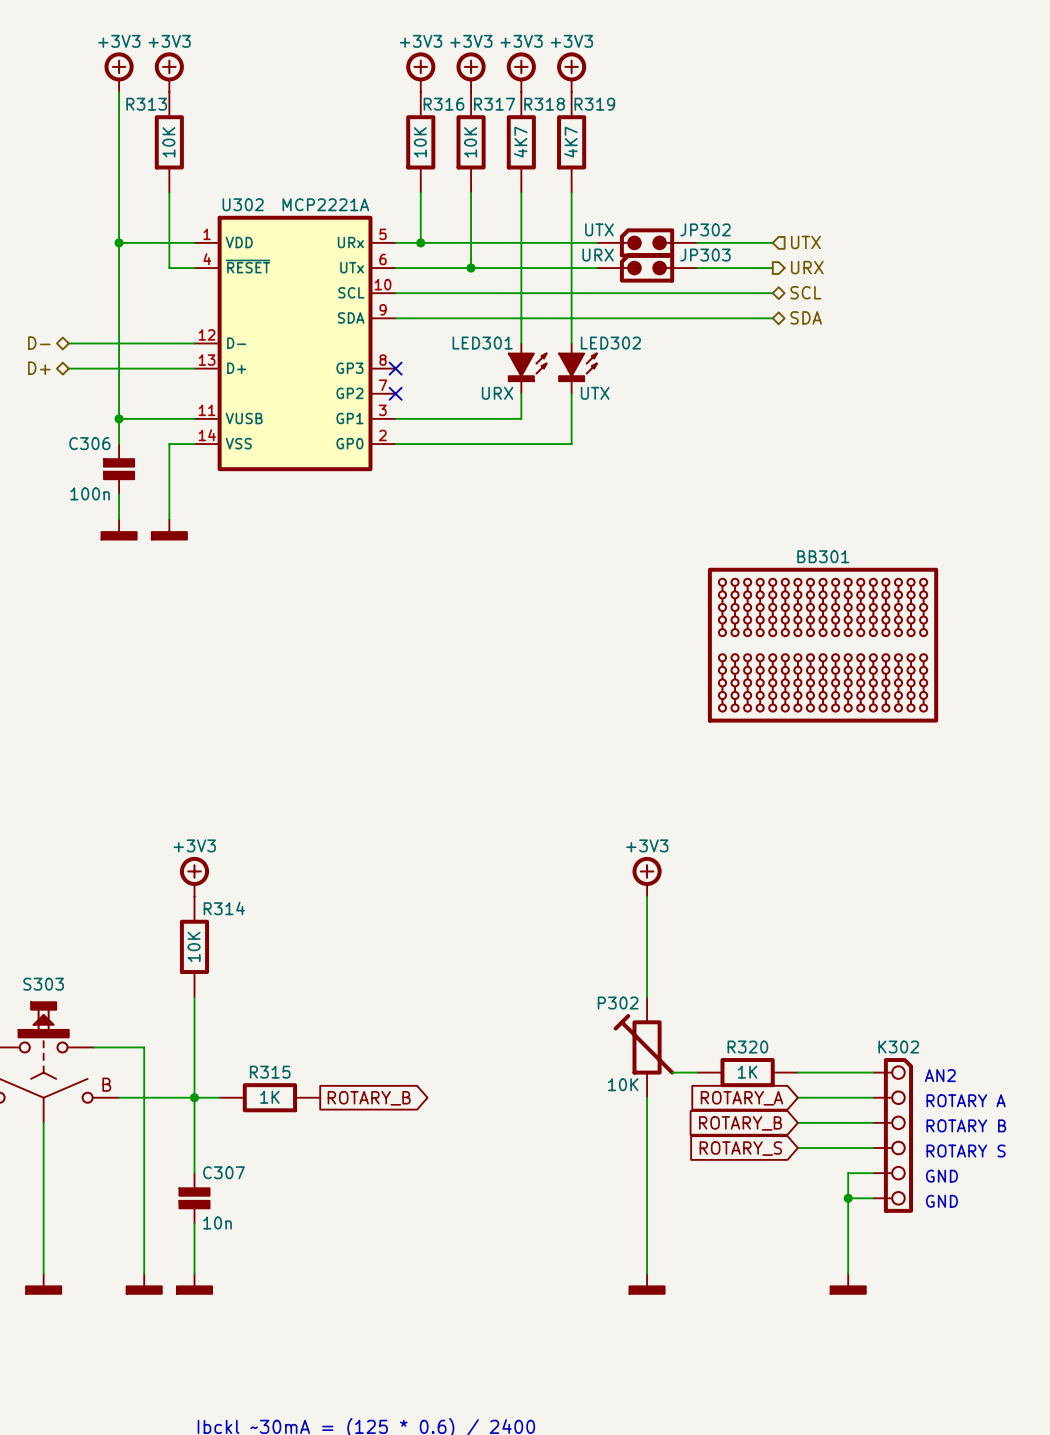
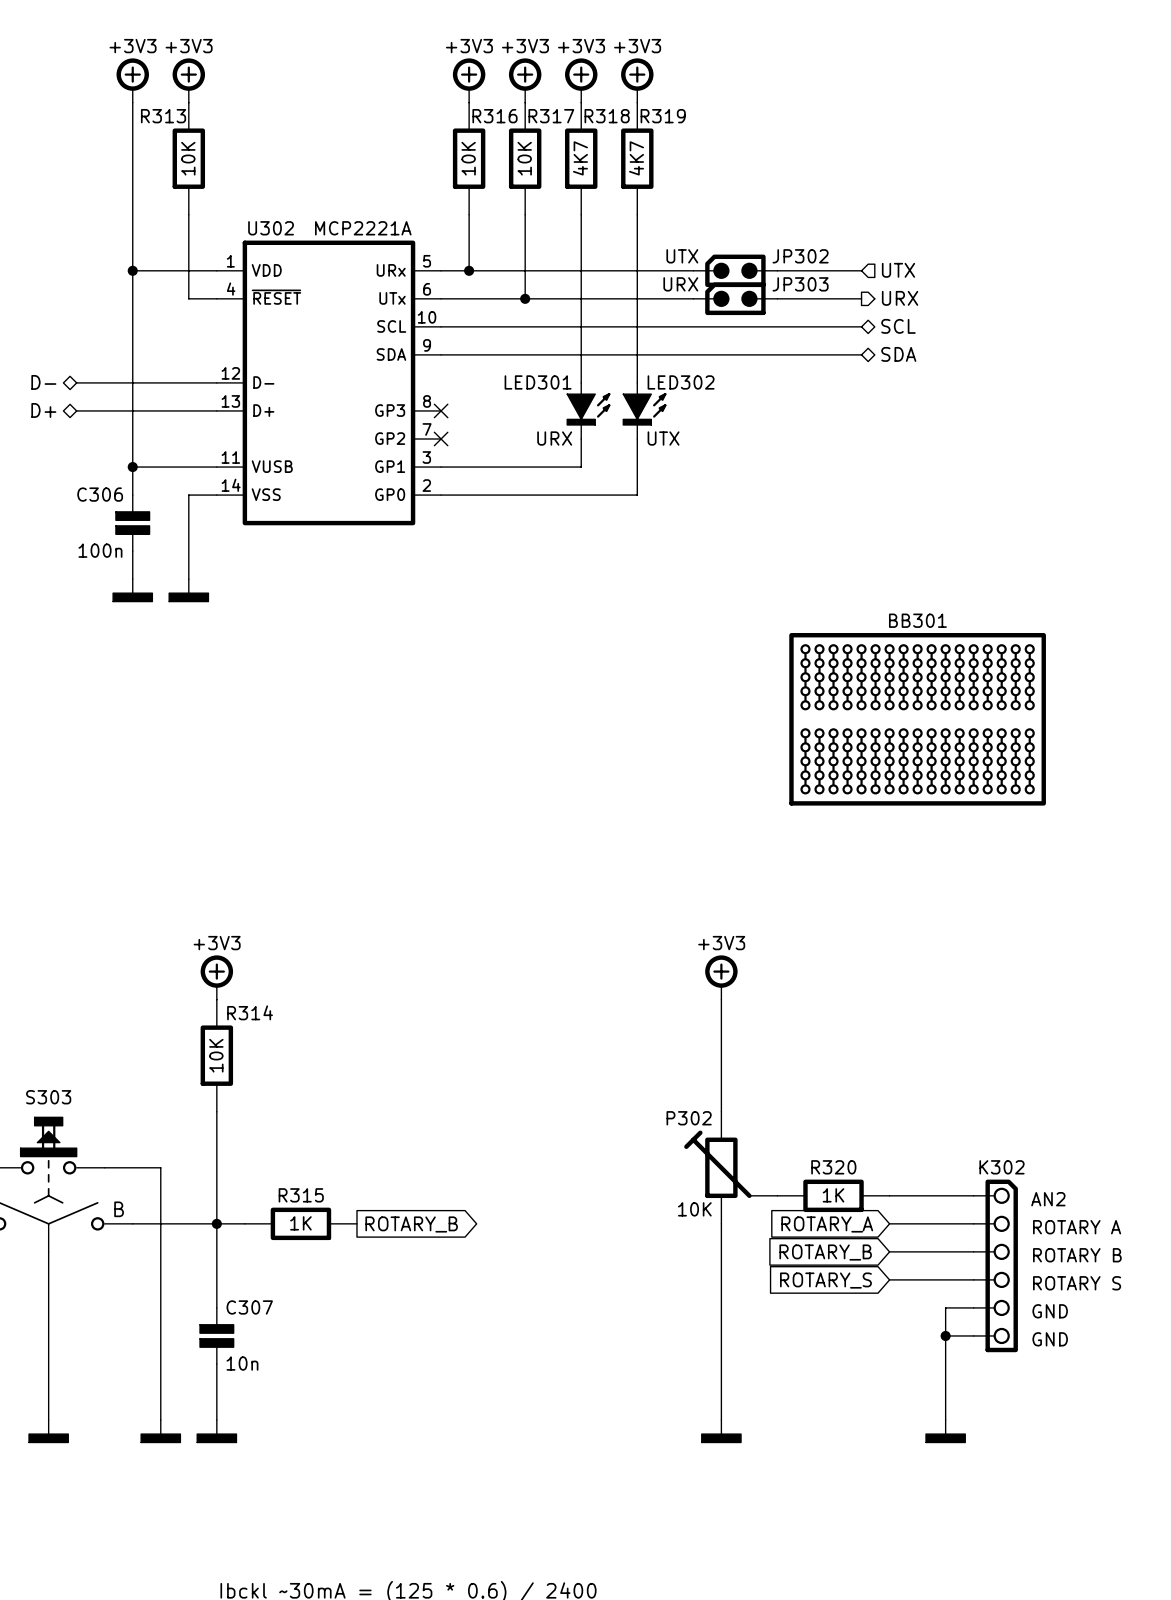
JP302 symbol: [596, 228, 698, 258] -> [693, 254, 778, 288]
JP303 symbol: [596, 253, 698, 283] -> [693, 282, 778, 316]

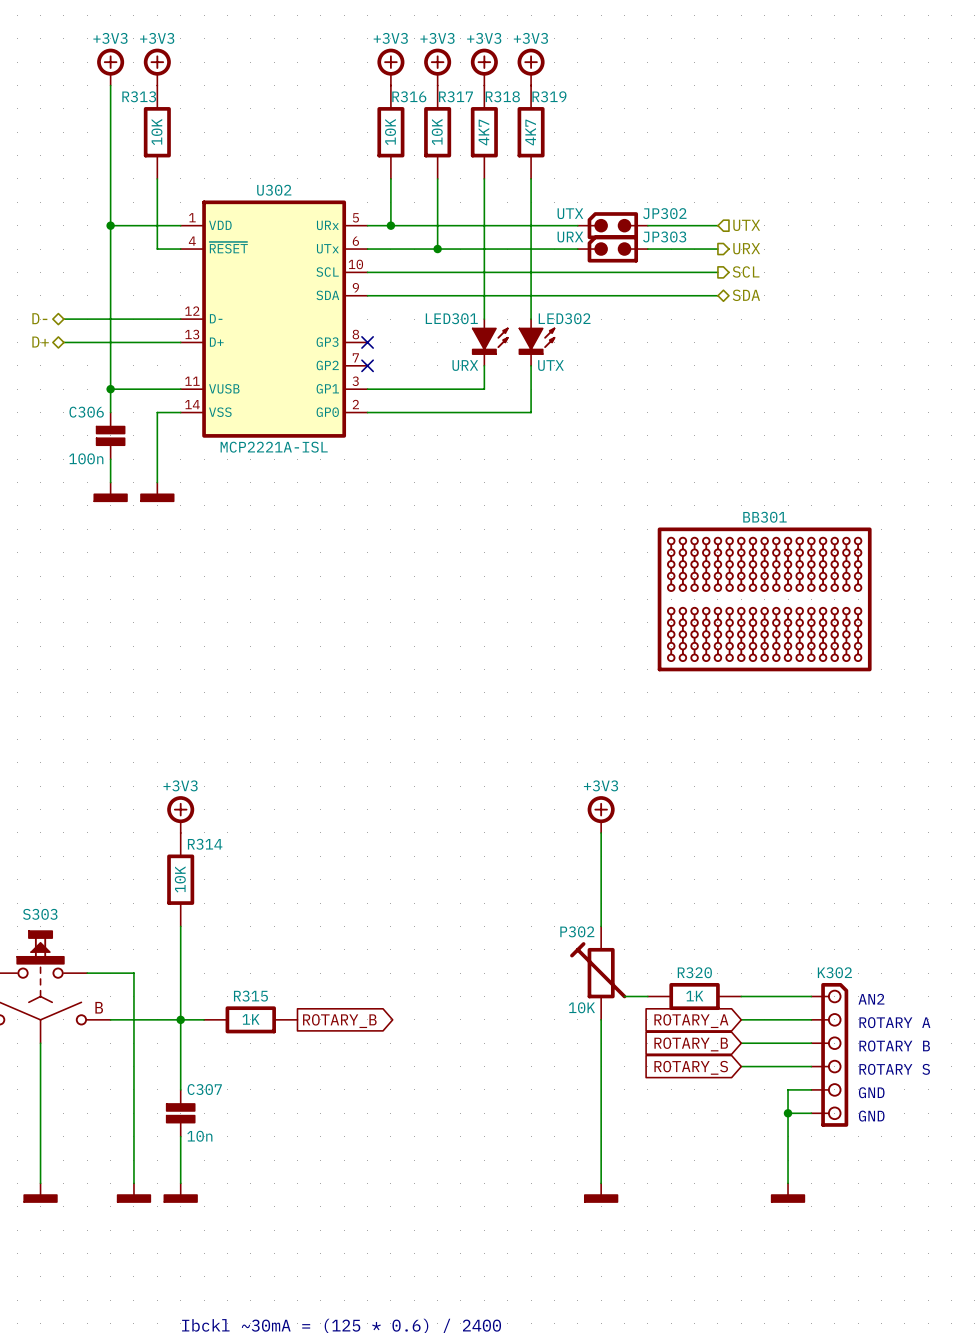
U302 name position: U302 (271, 228) -> U302 (274, 190)
U302 value: MCP2221A (363, 228) -> MCP2221A-ISL (274, 447)
hierarchical label shape: bidirectional (898, 326) -> output (746, 271)

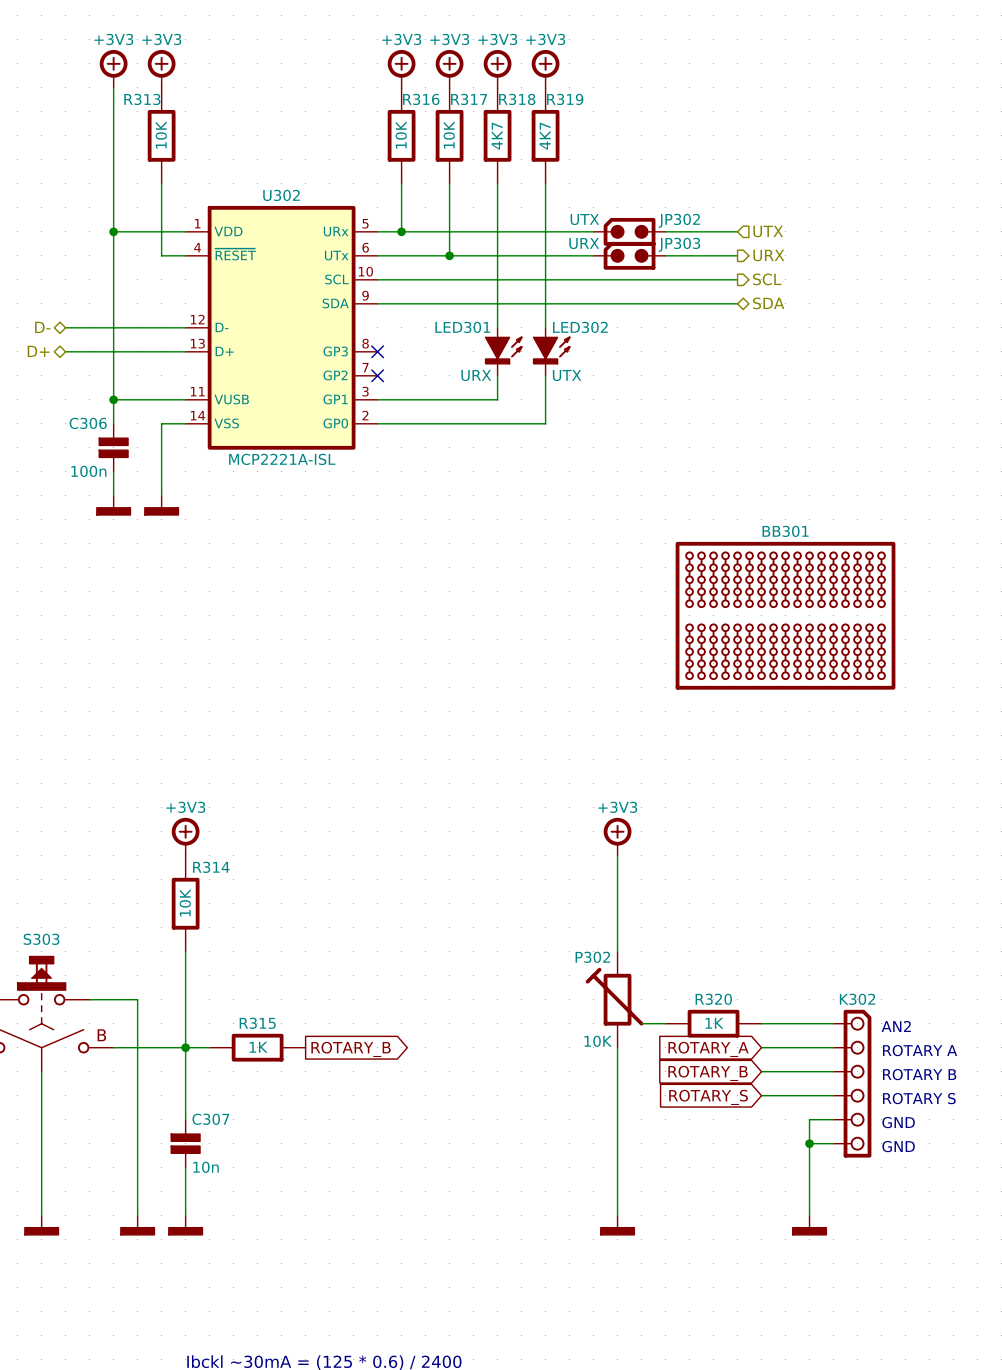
P302 value: 10K (581, 1007) -> none
P302 text: none -> 10K (598, 1041)

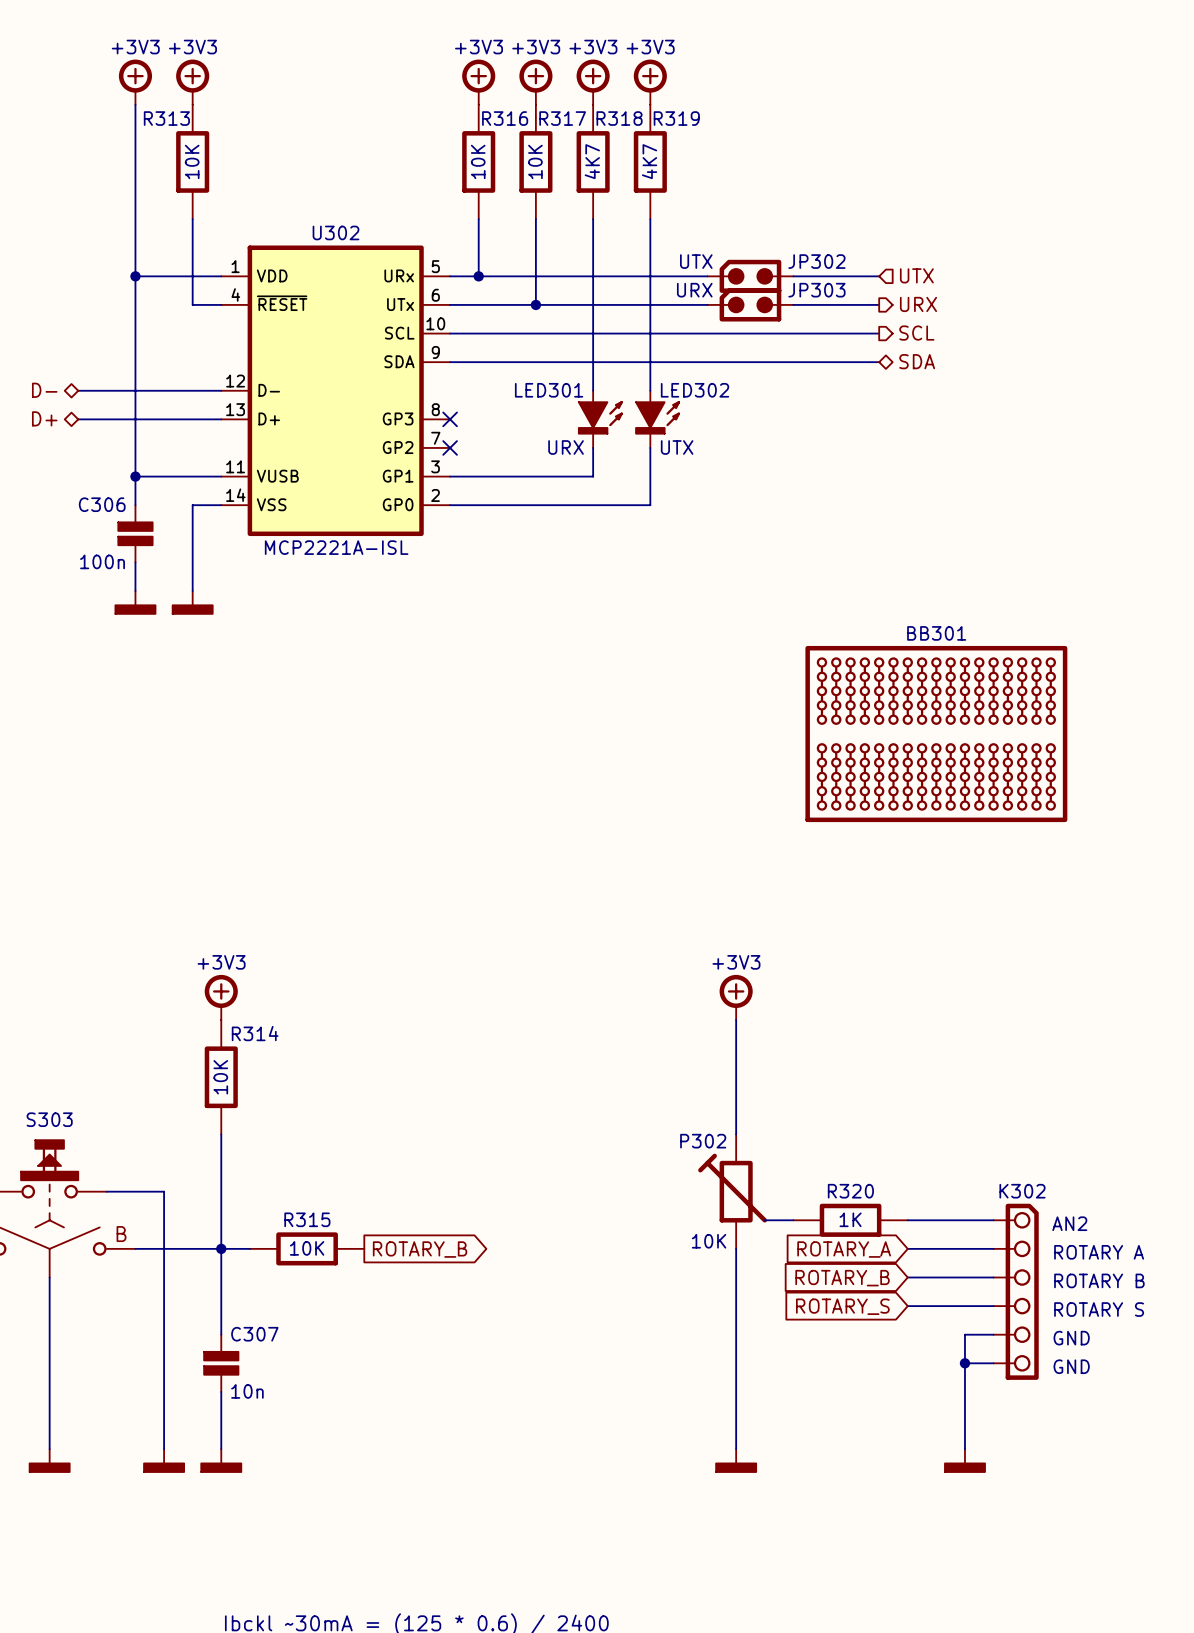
R315 value: 1K (258, 1047) -> 10K (307, 1248)

